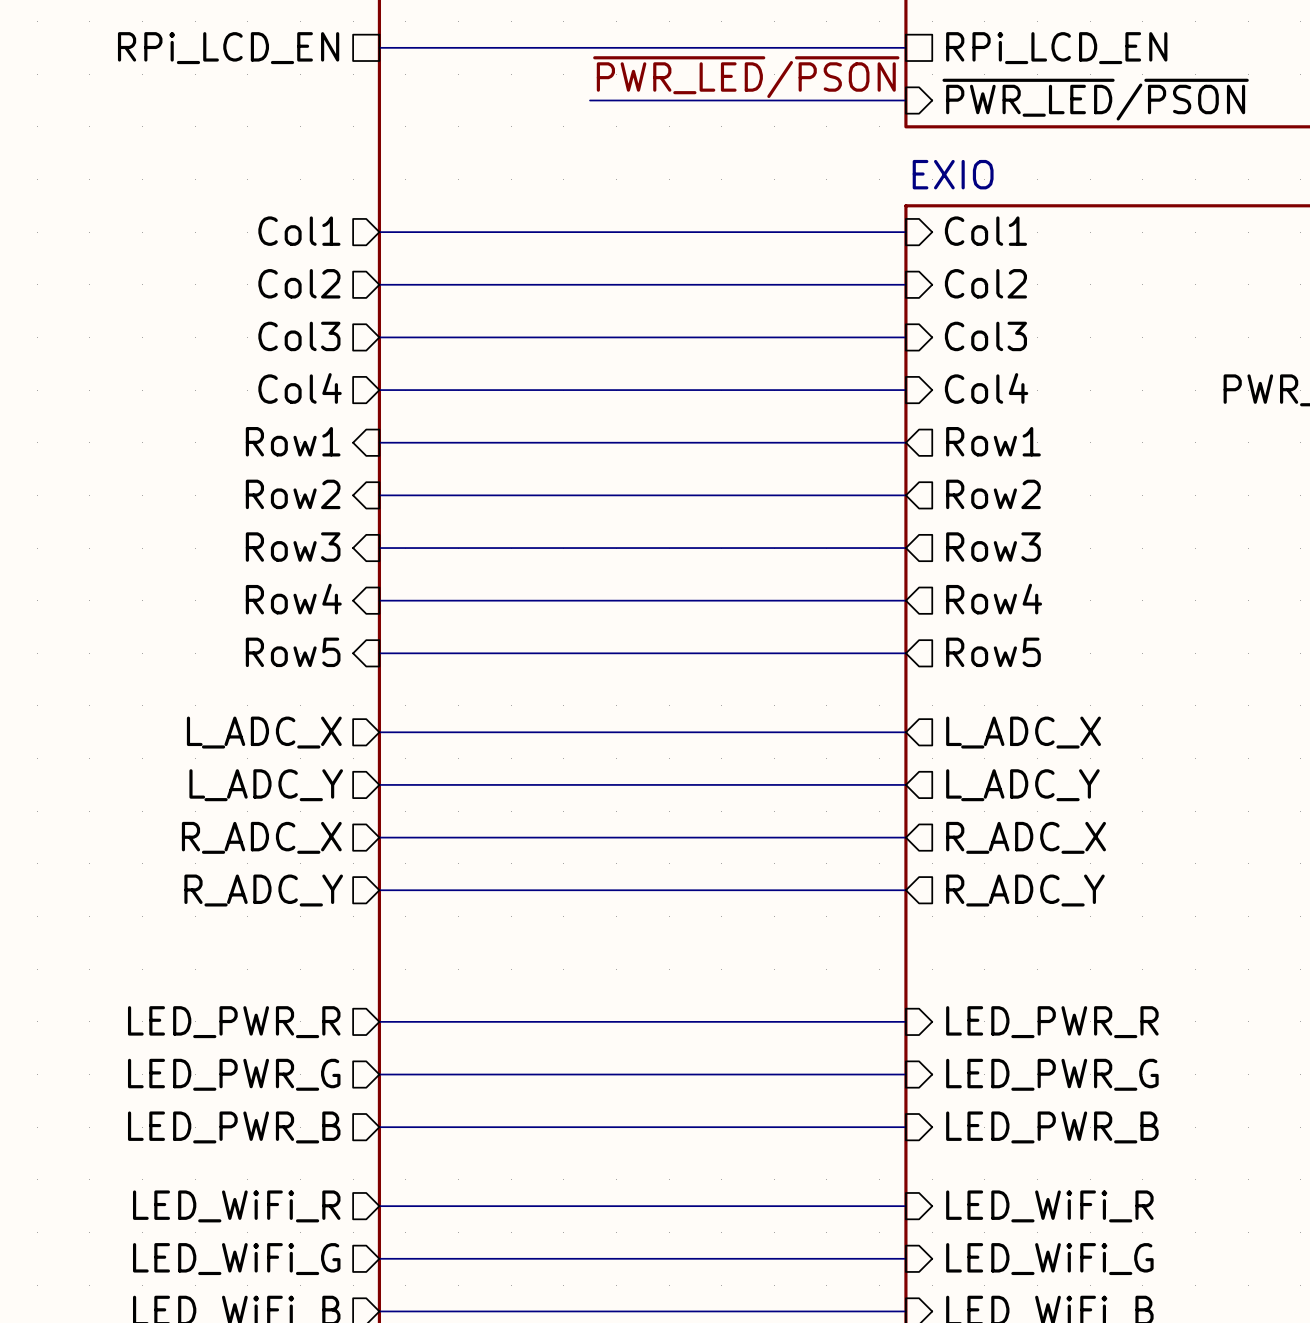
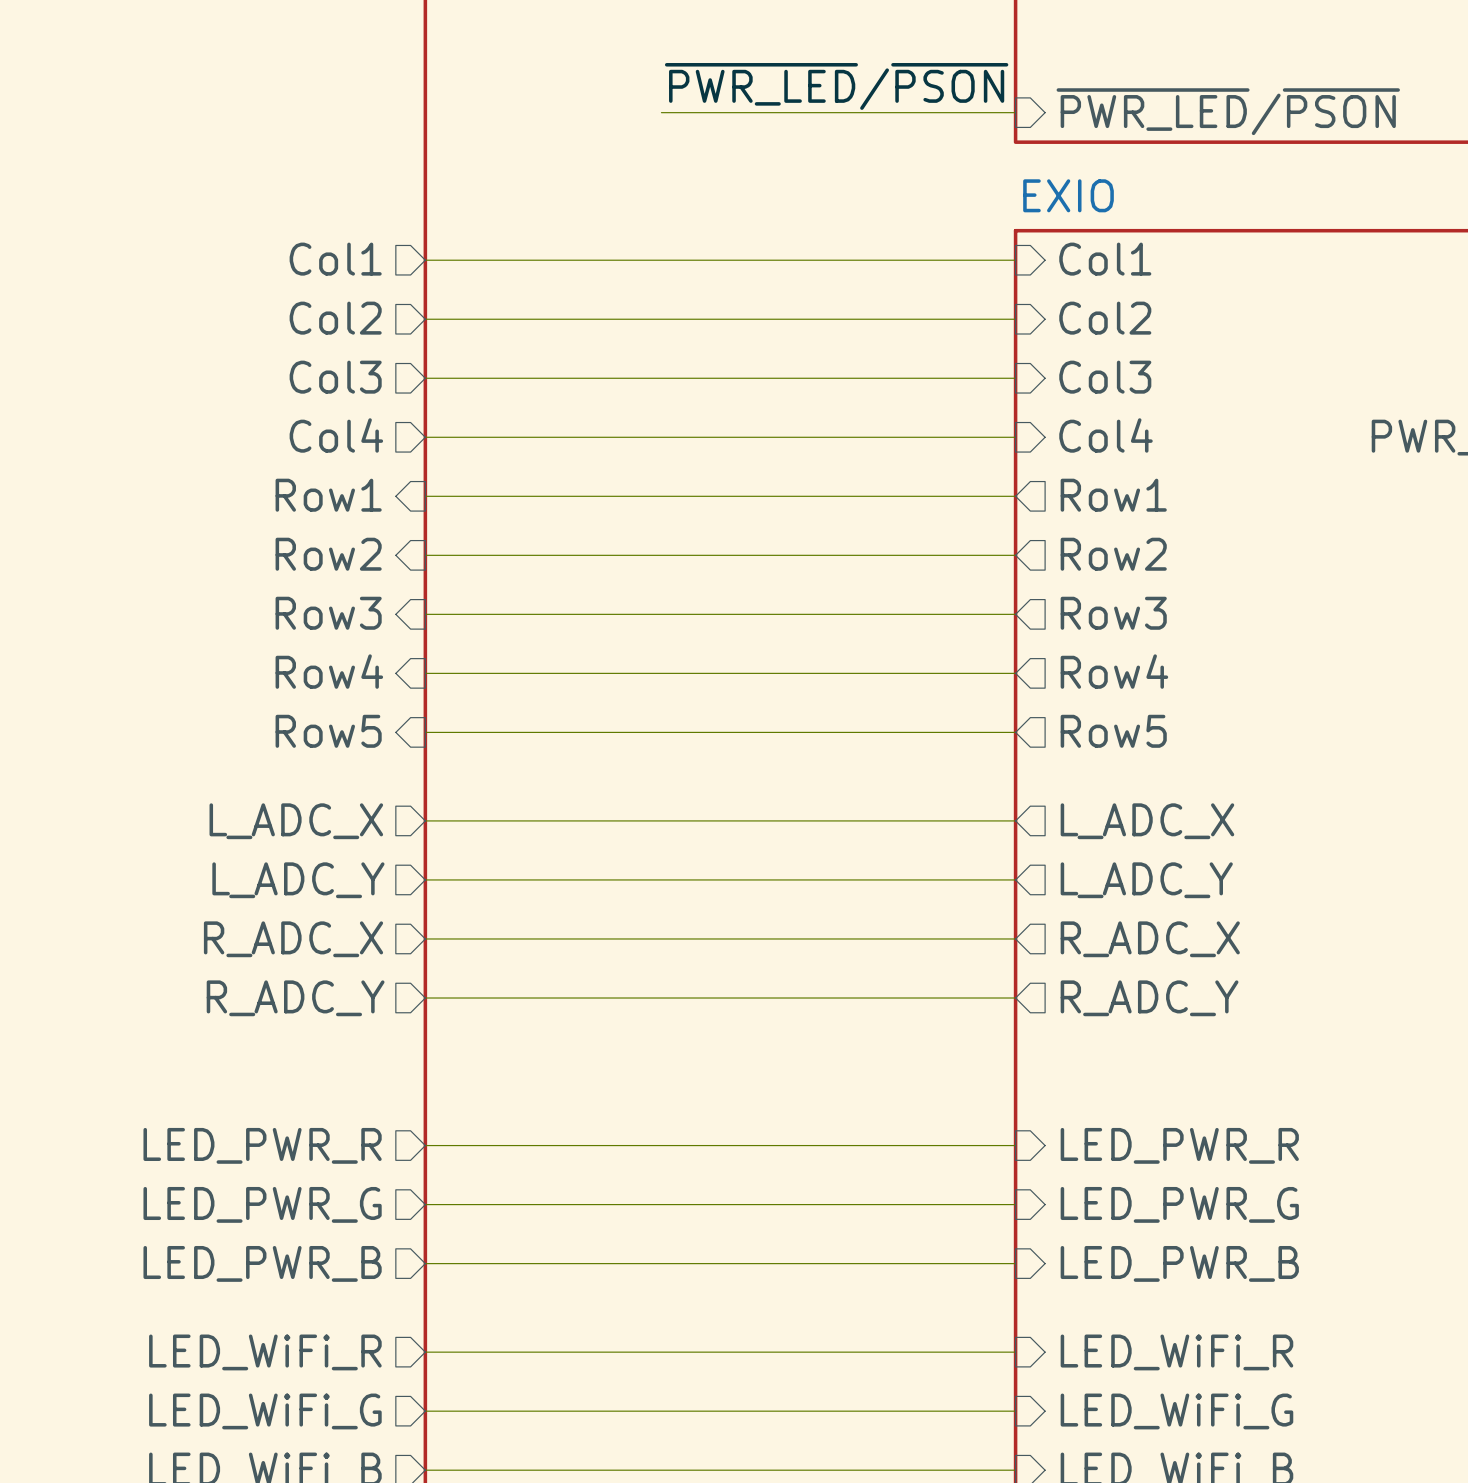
wire: (379, 47) (905, 47) -> none
sheet pin: RPi_LCD_EN (228, 48) -> none
sheet pin: RPi_LCD_EN (1056, 48) -> none

